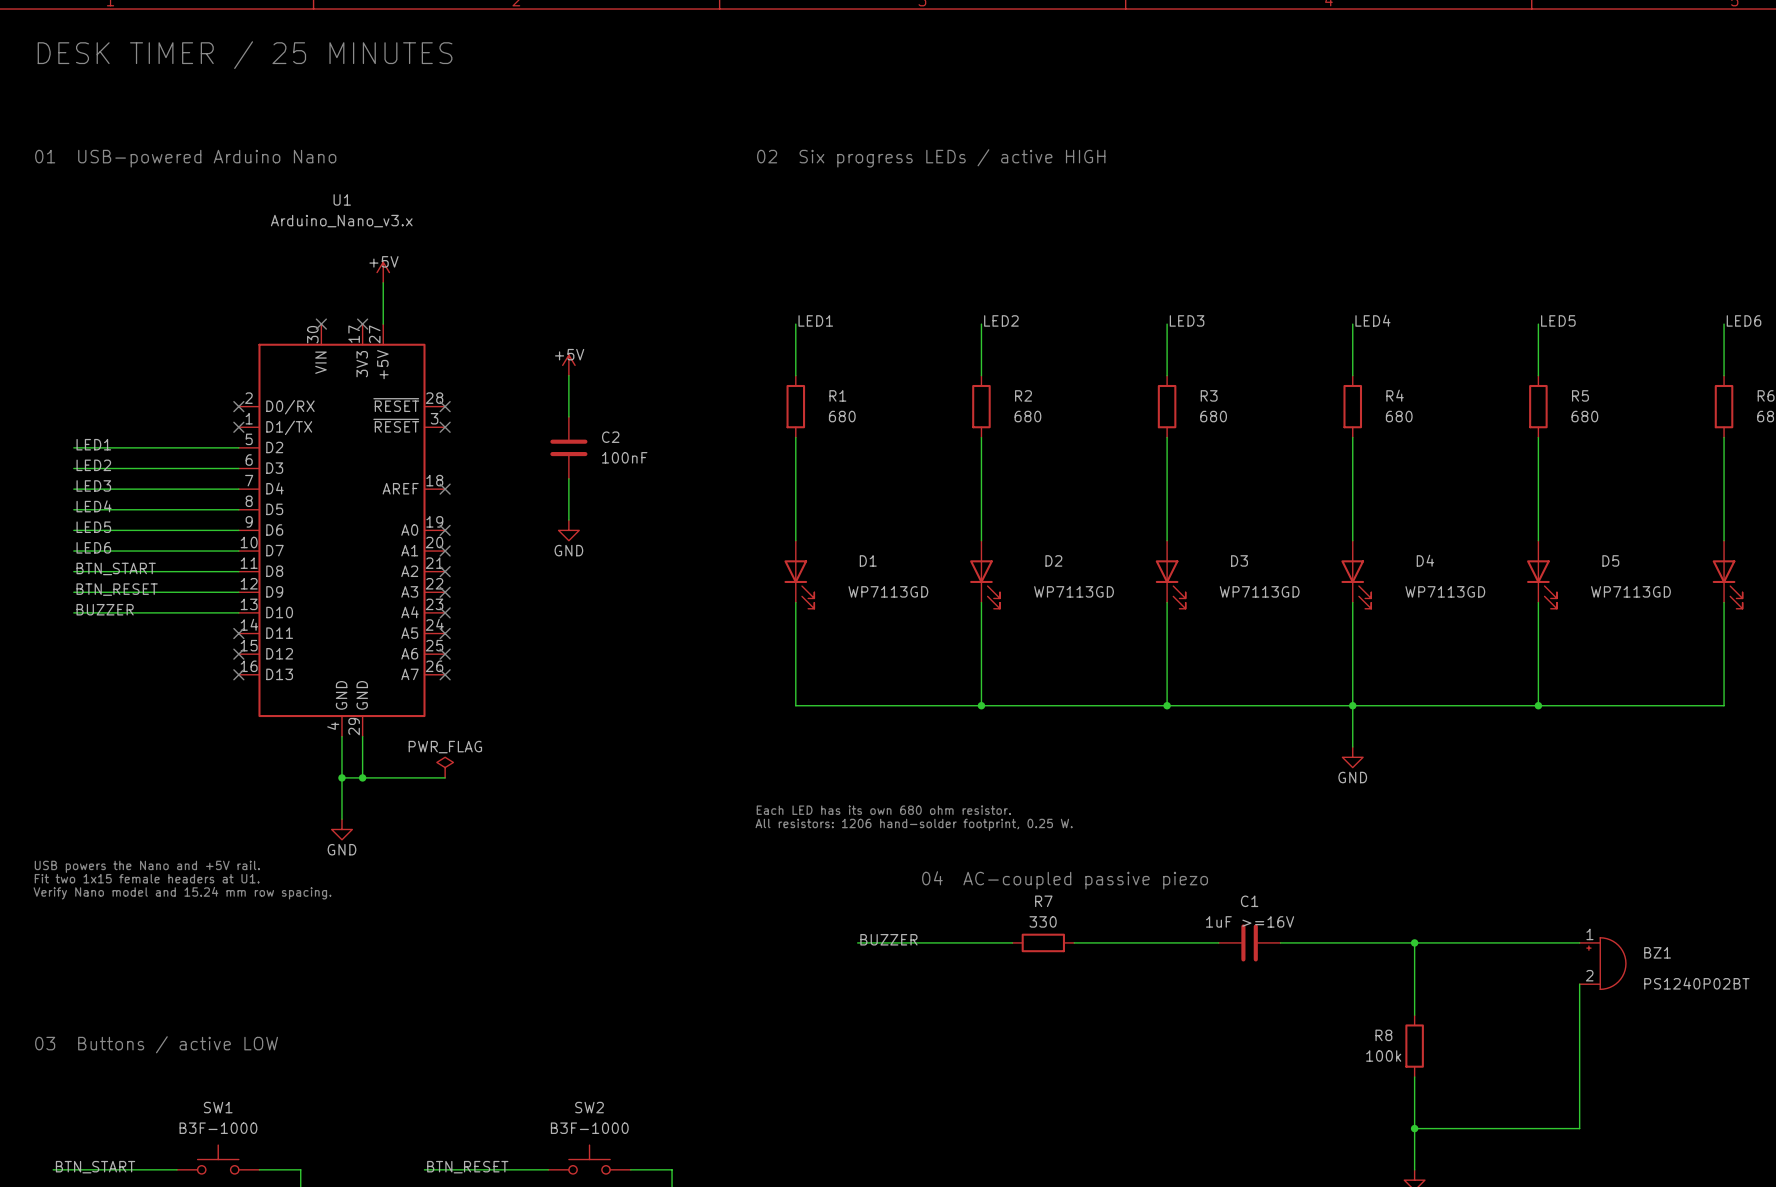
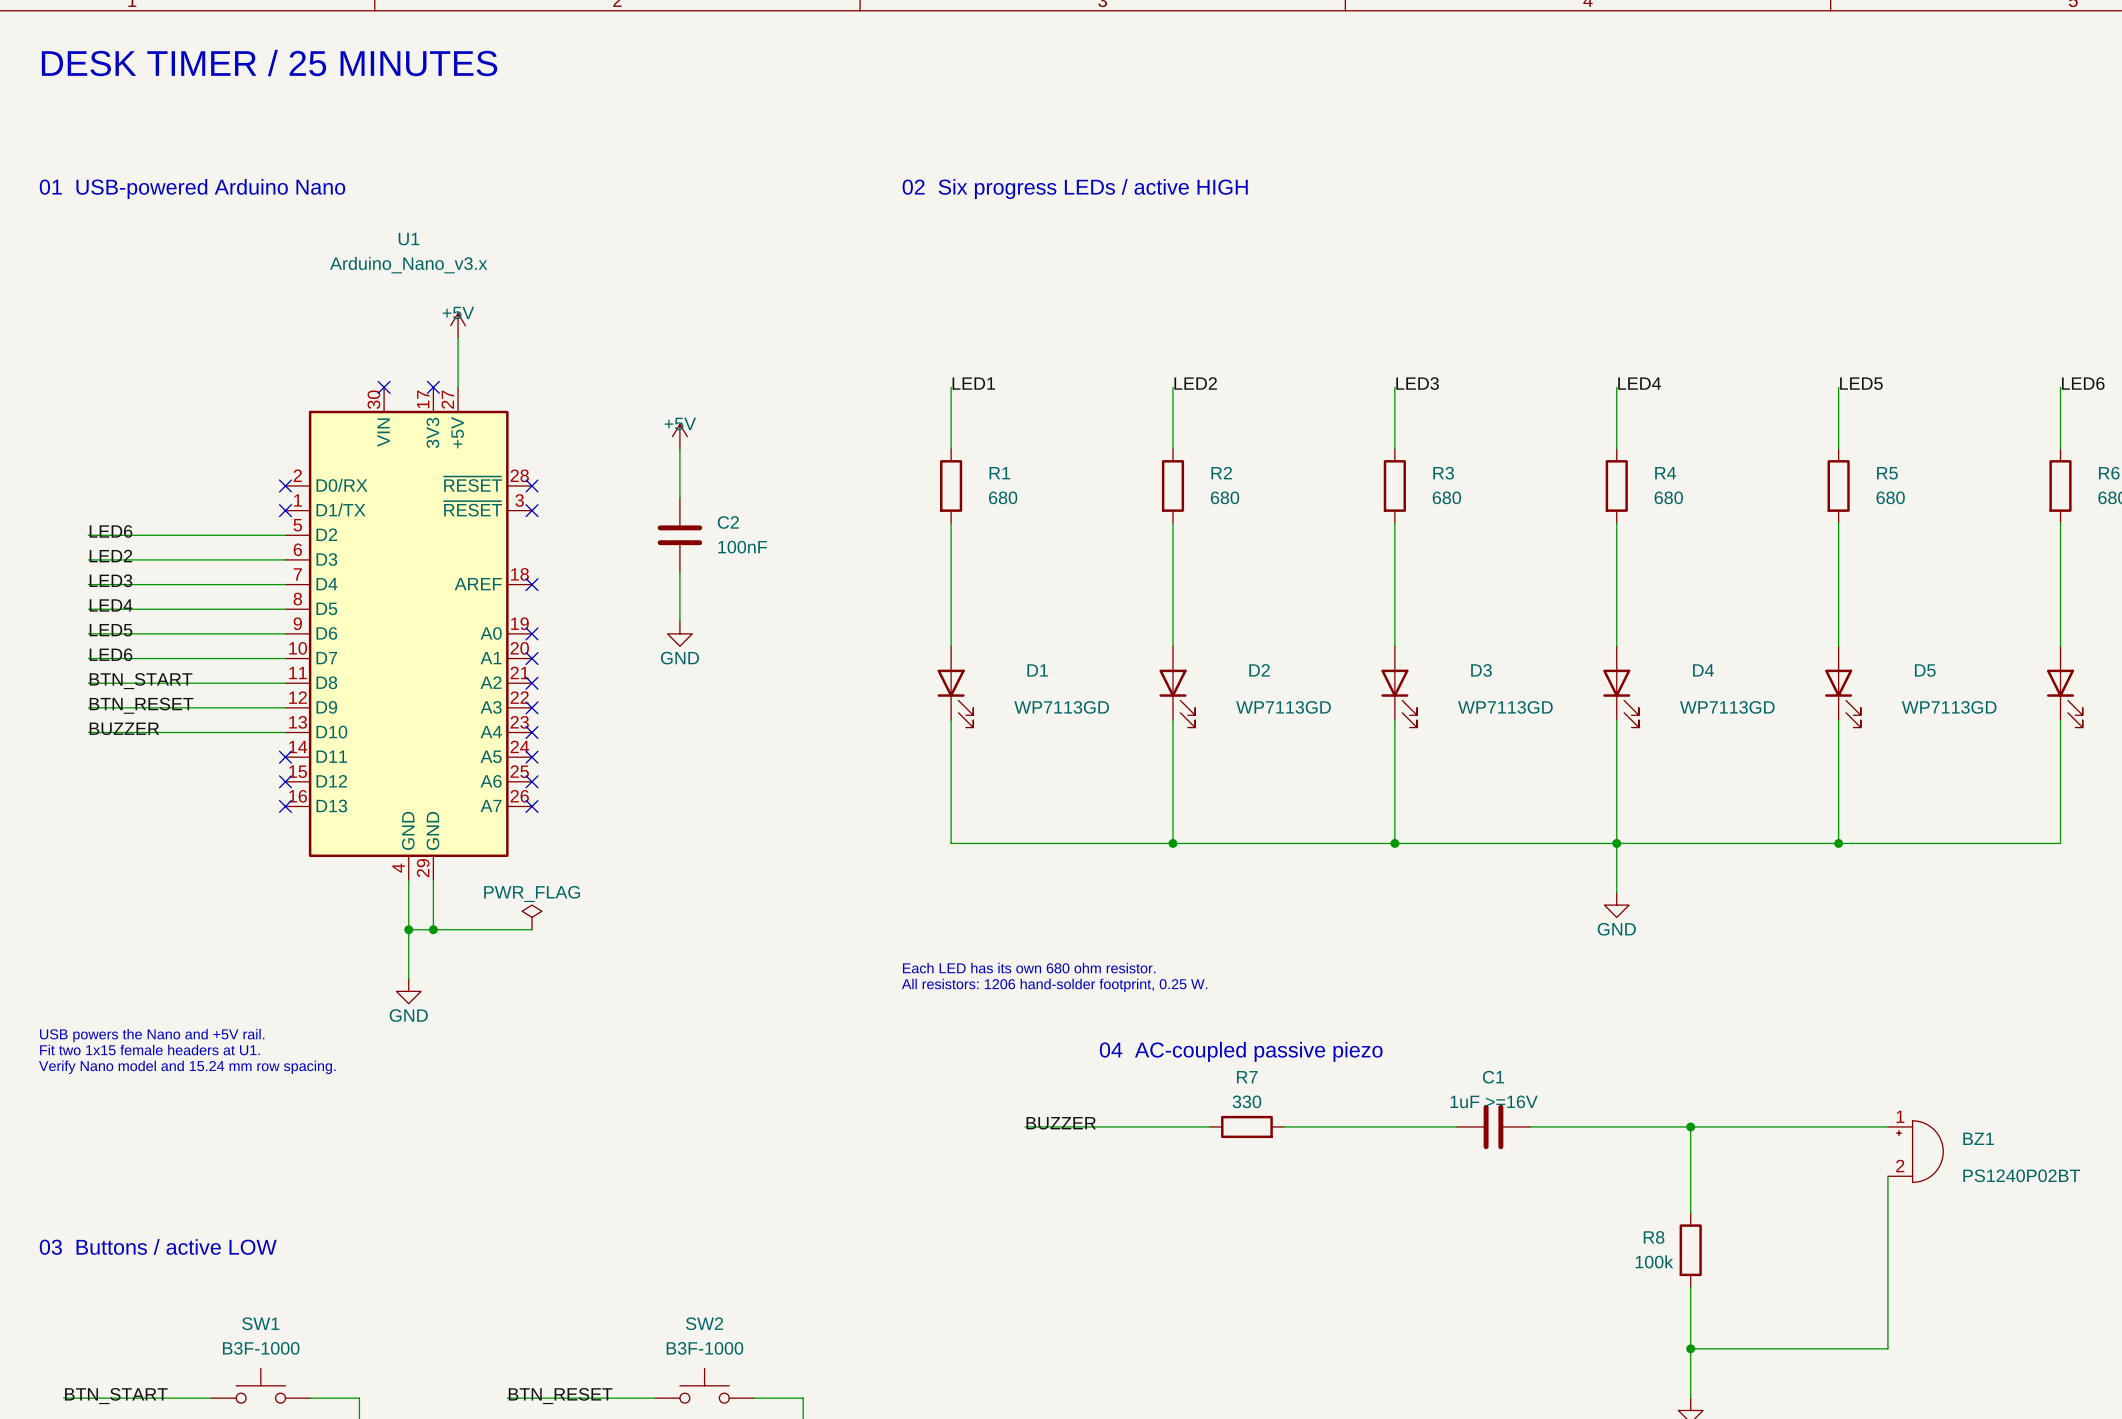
label: LED1 (93, 444) -> LED6 (110, 531)

